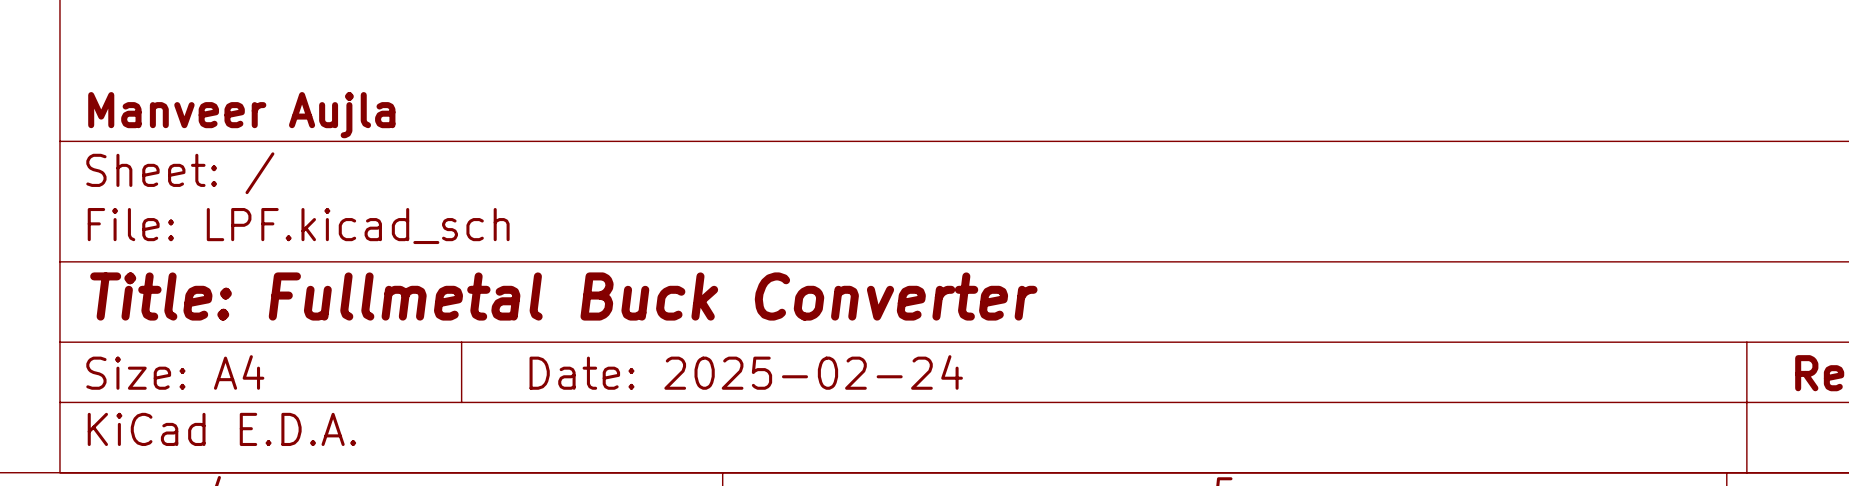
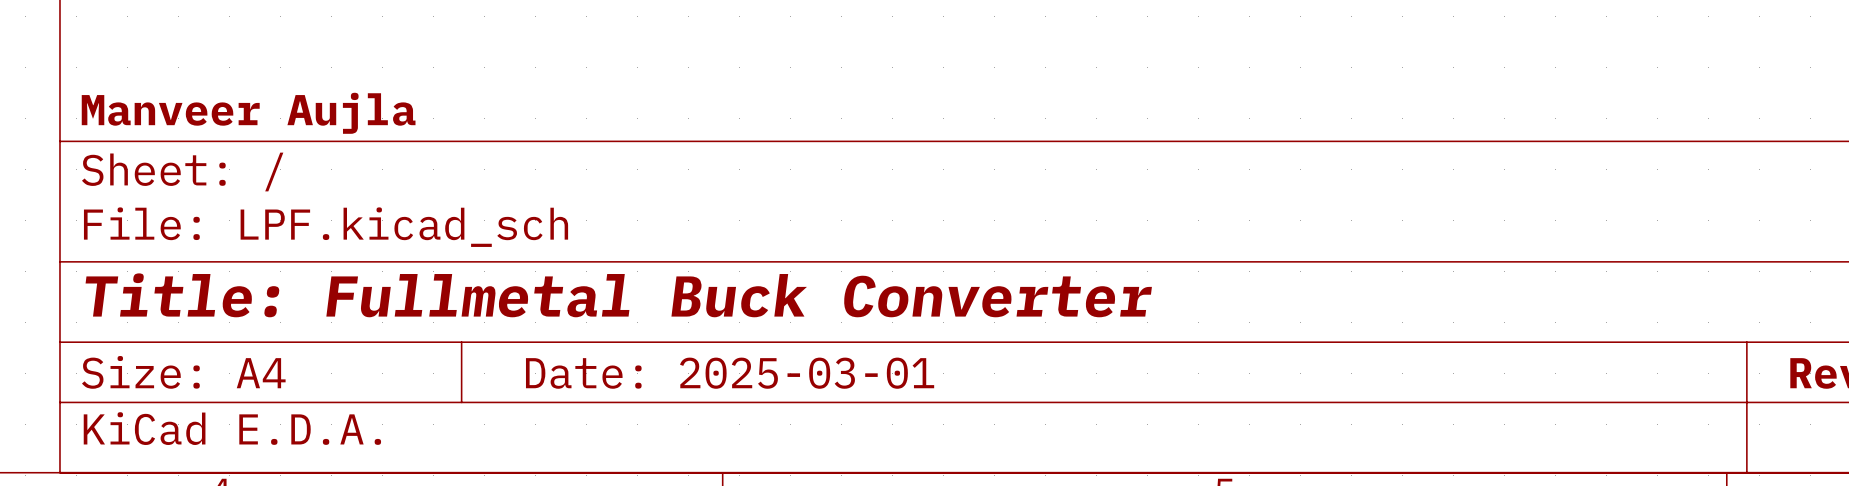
title block: Date: 2025-02-24 (746, 372) -> Date: 2025-03-01 (730, 373)

